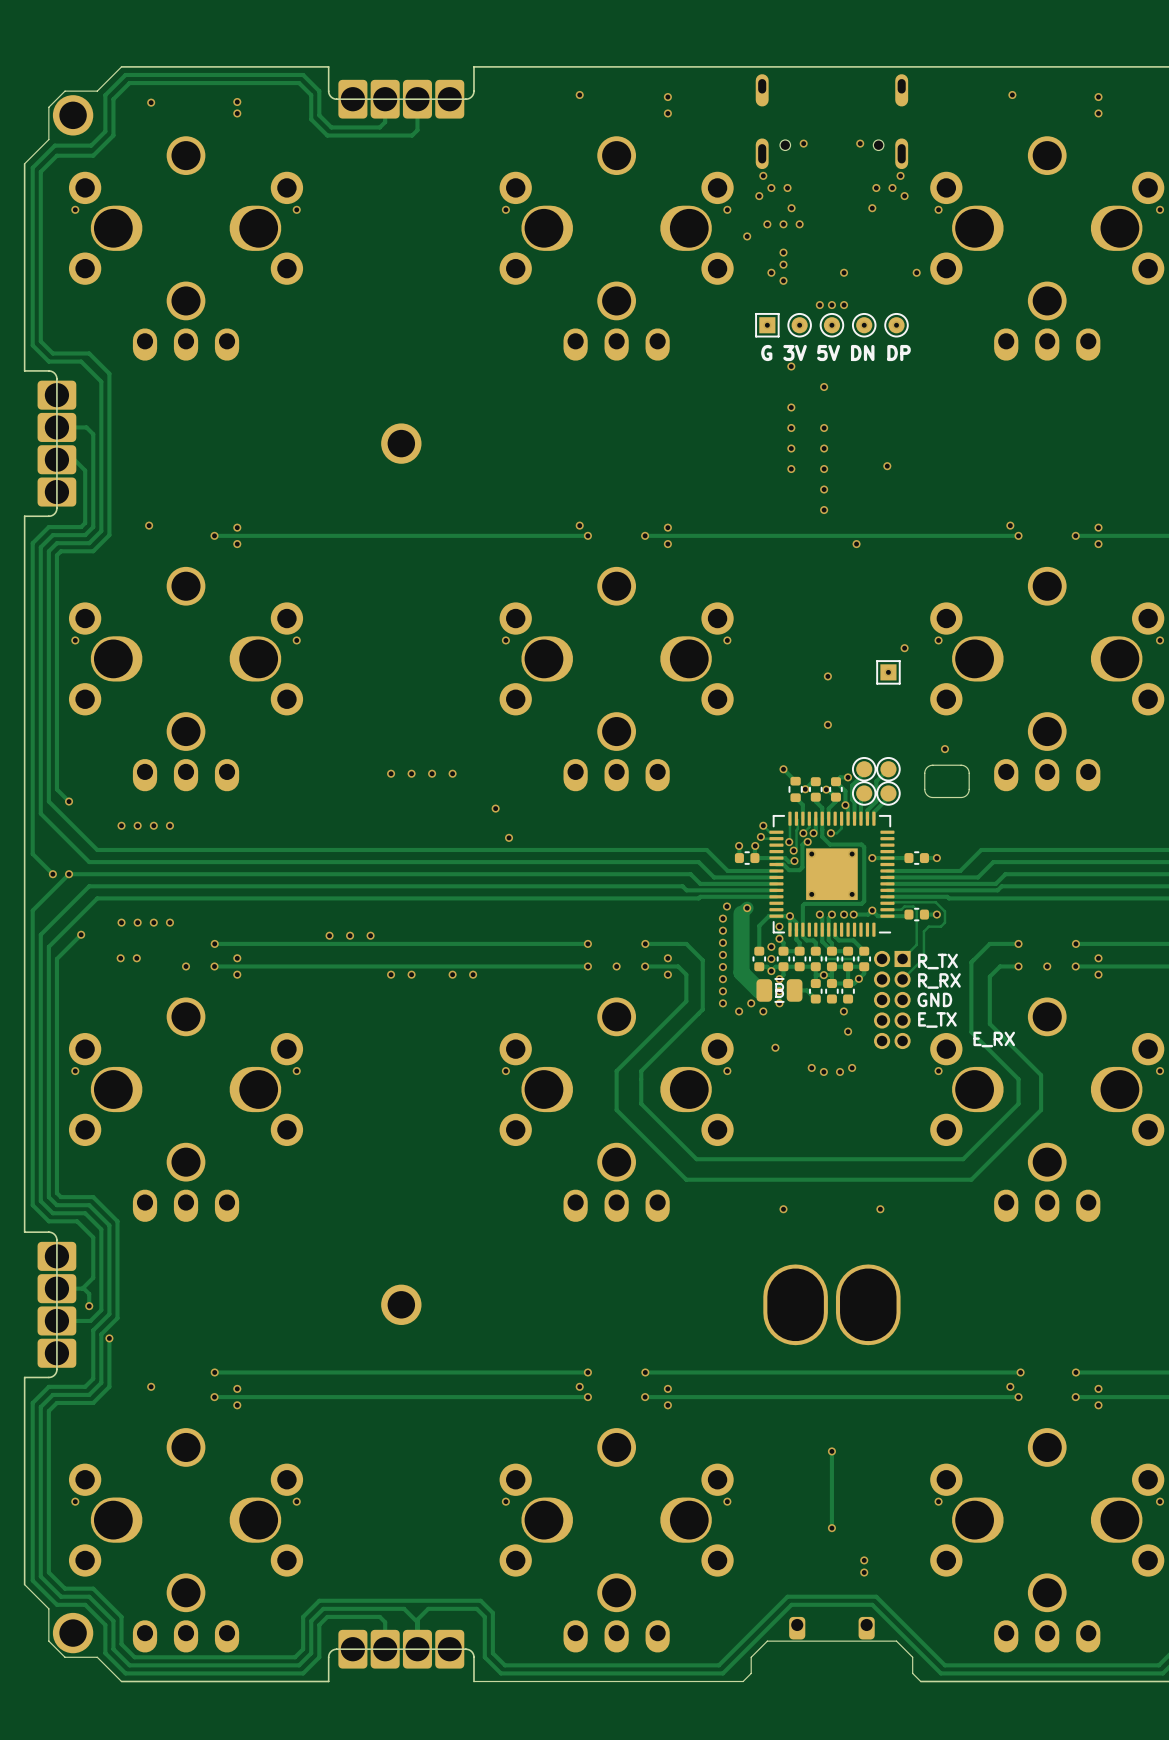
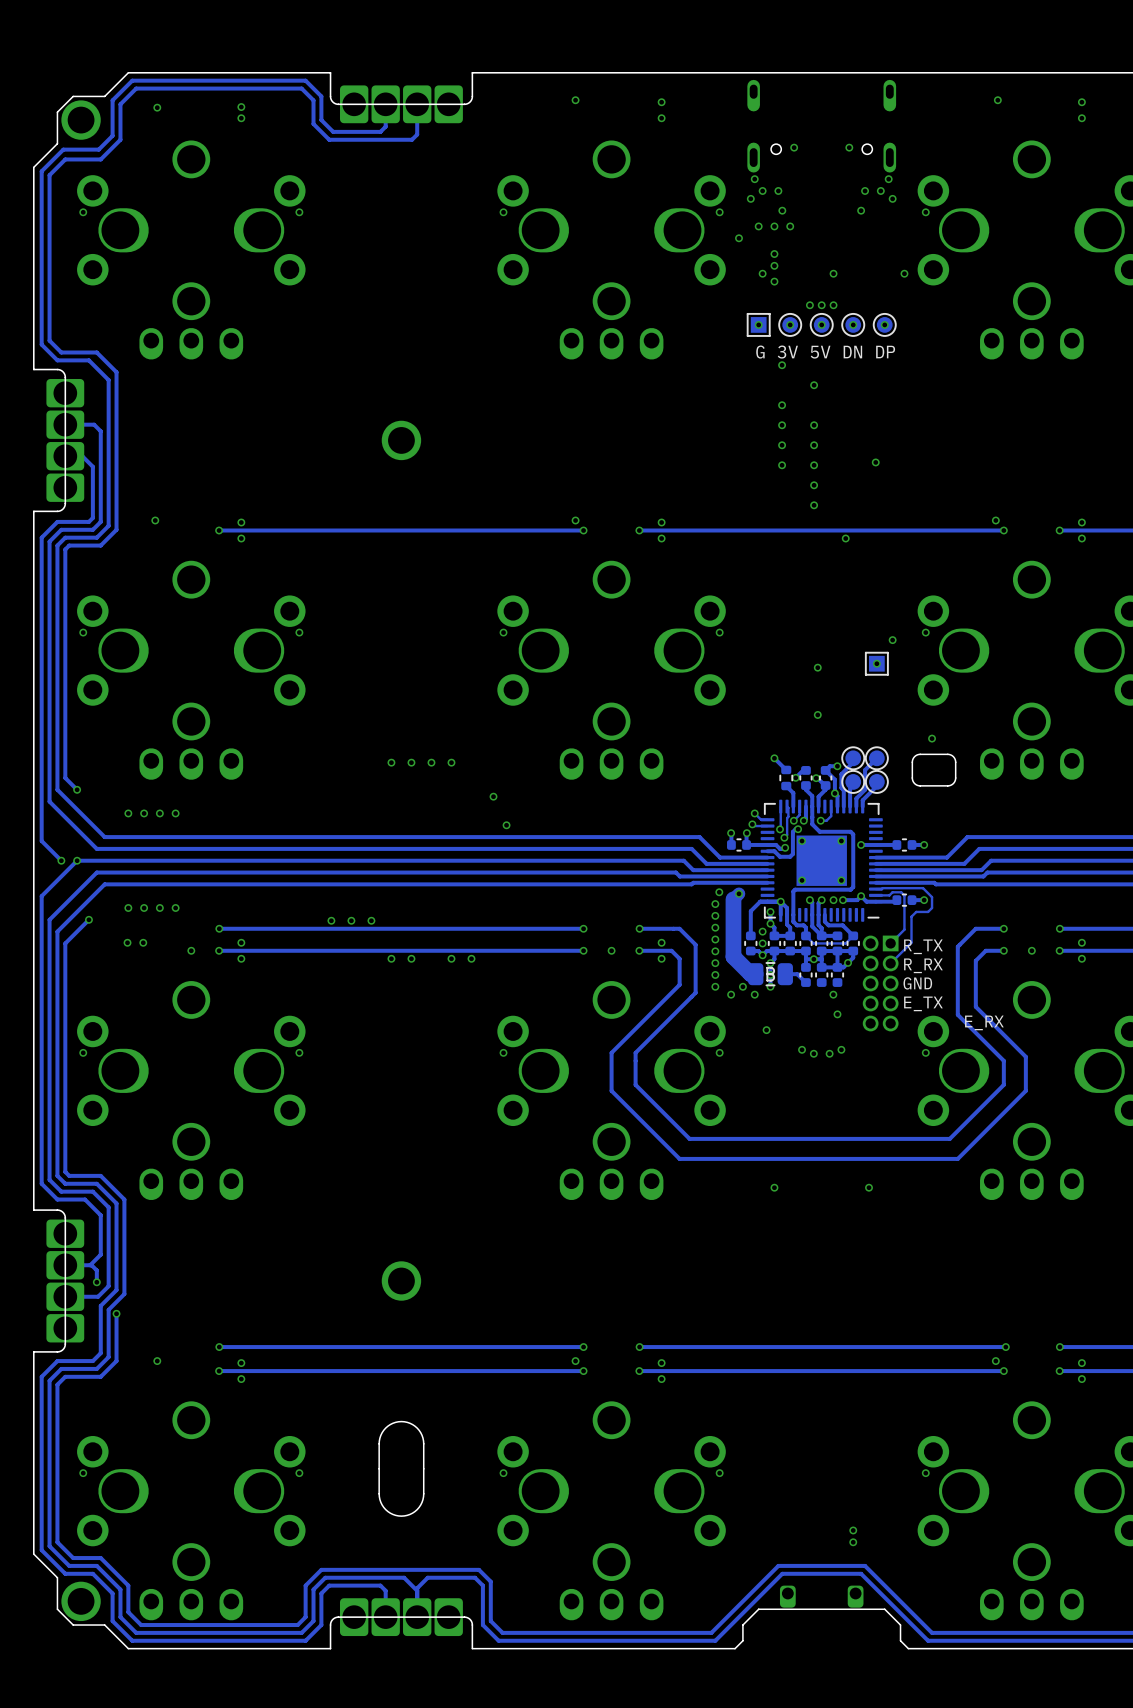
part: (831, 1304) -> none
track: (831, 1451) (831, 1528) -> none
via: (831, 1451) -> none
board edge: none -> (423, 1443) (422, 1502) (417, 1509) (409, 1514) (401, 1516) (392, 1514) (383, 1507) (379, 1496) (380, 1435) (390, 1424) (404, 1421) (412, 1424) (419, 1430) (423, 1443)
via: (831, 1528) -> none

